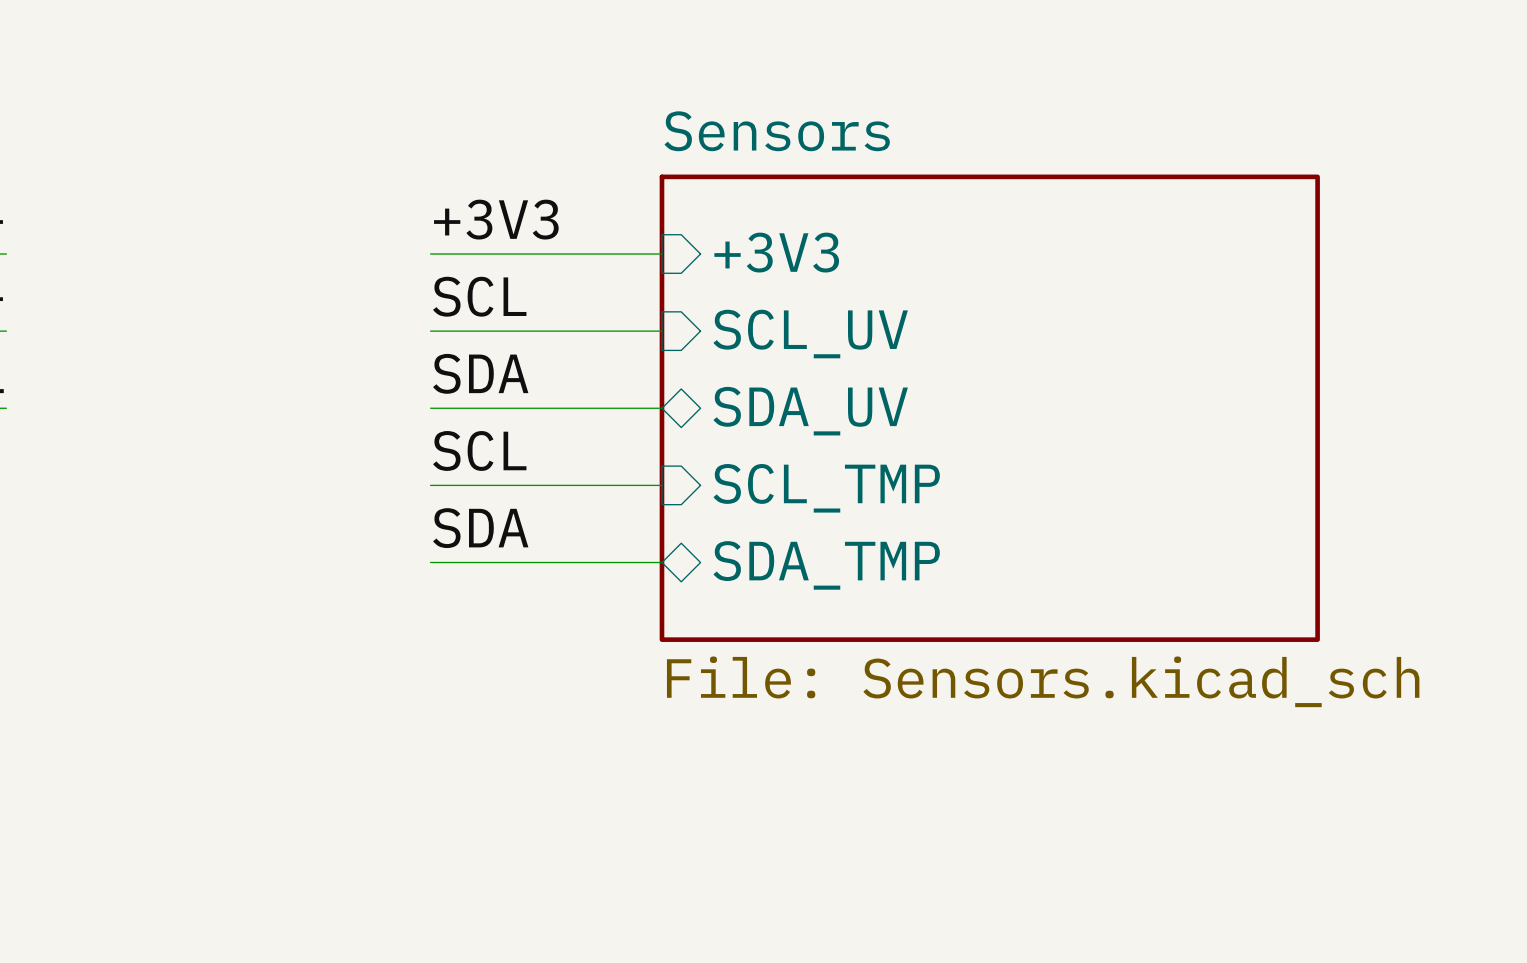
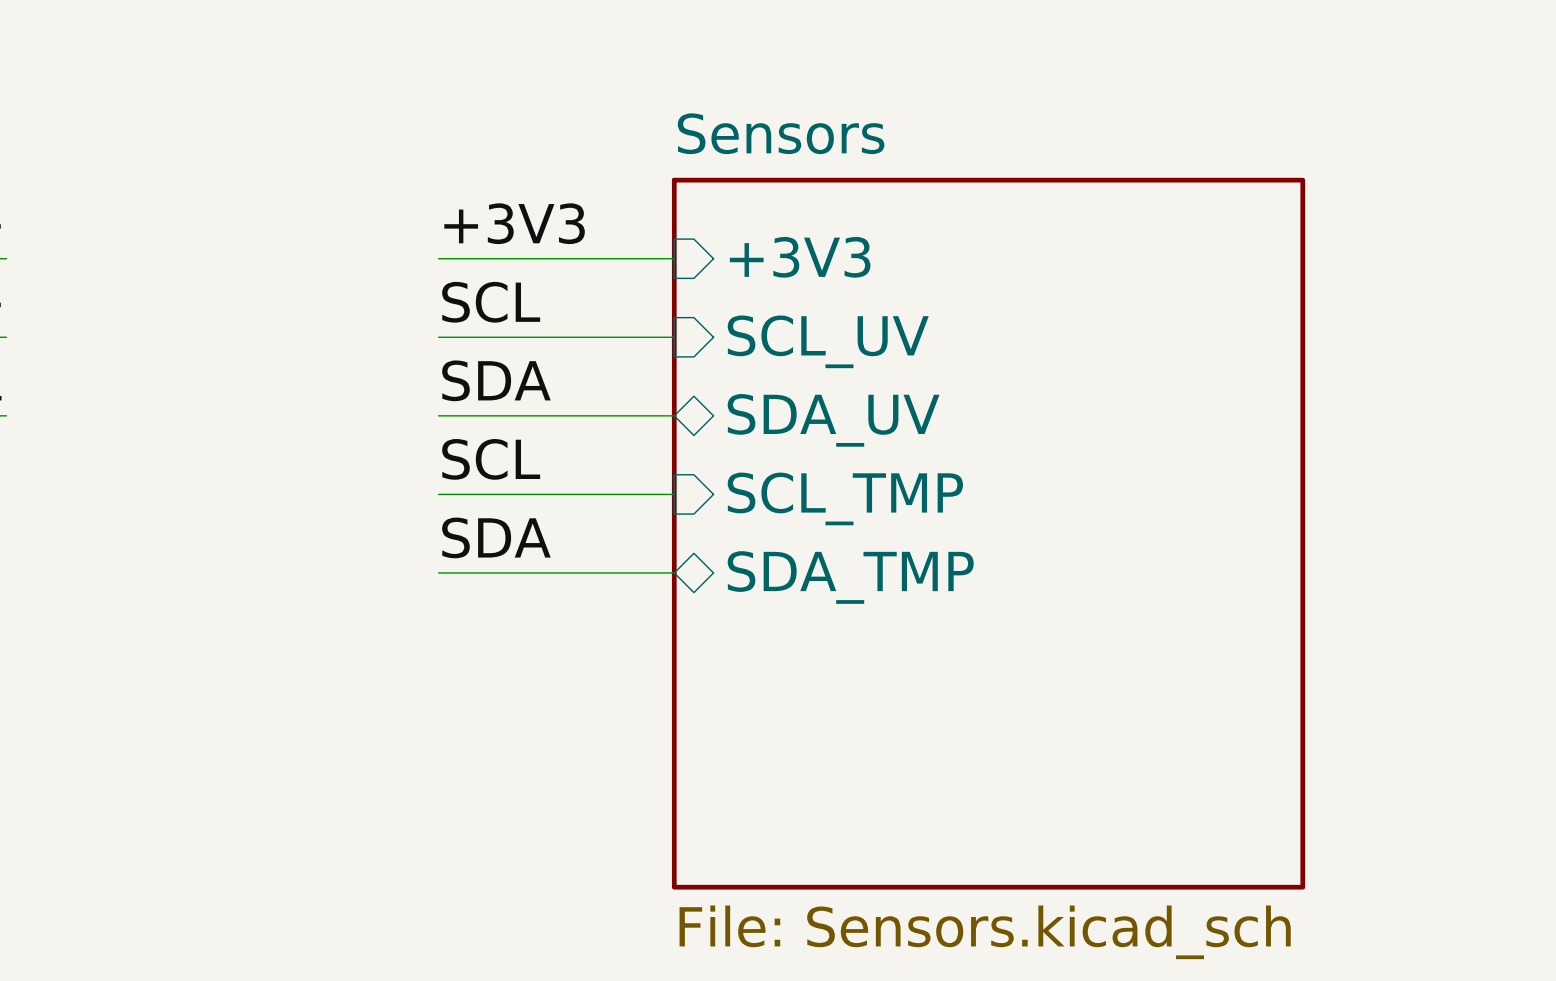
sheet Sensors: File: Sensors.kicad_sch (989, 408) -> none
sheet Sensors: none -> File: Sensors.kicad_sch (988, 533)

